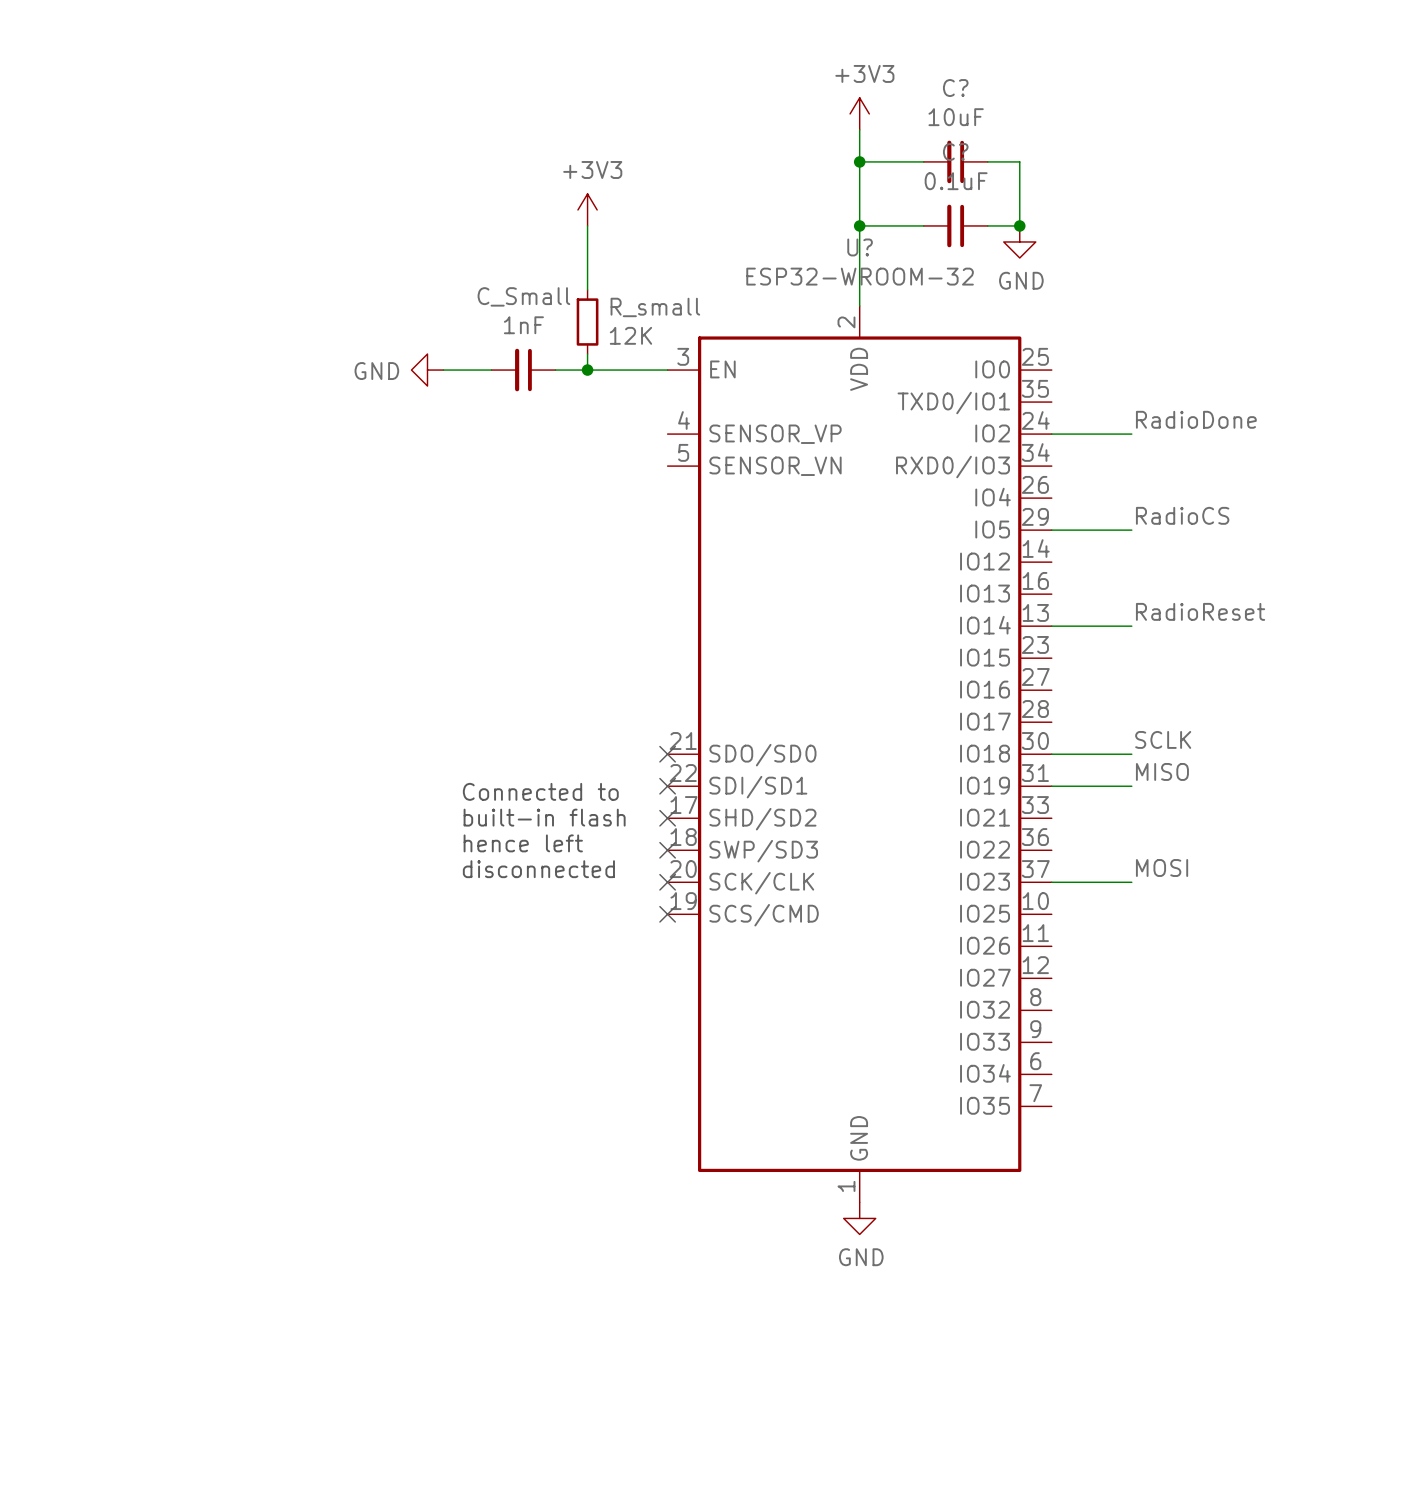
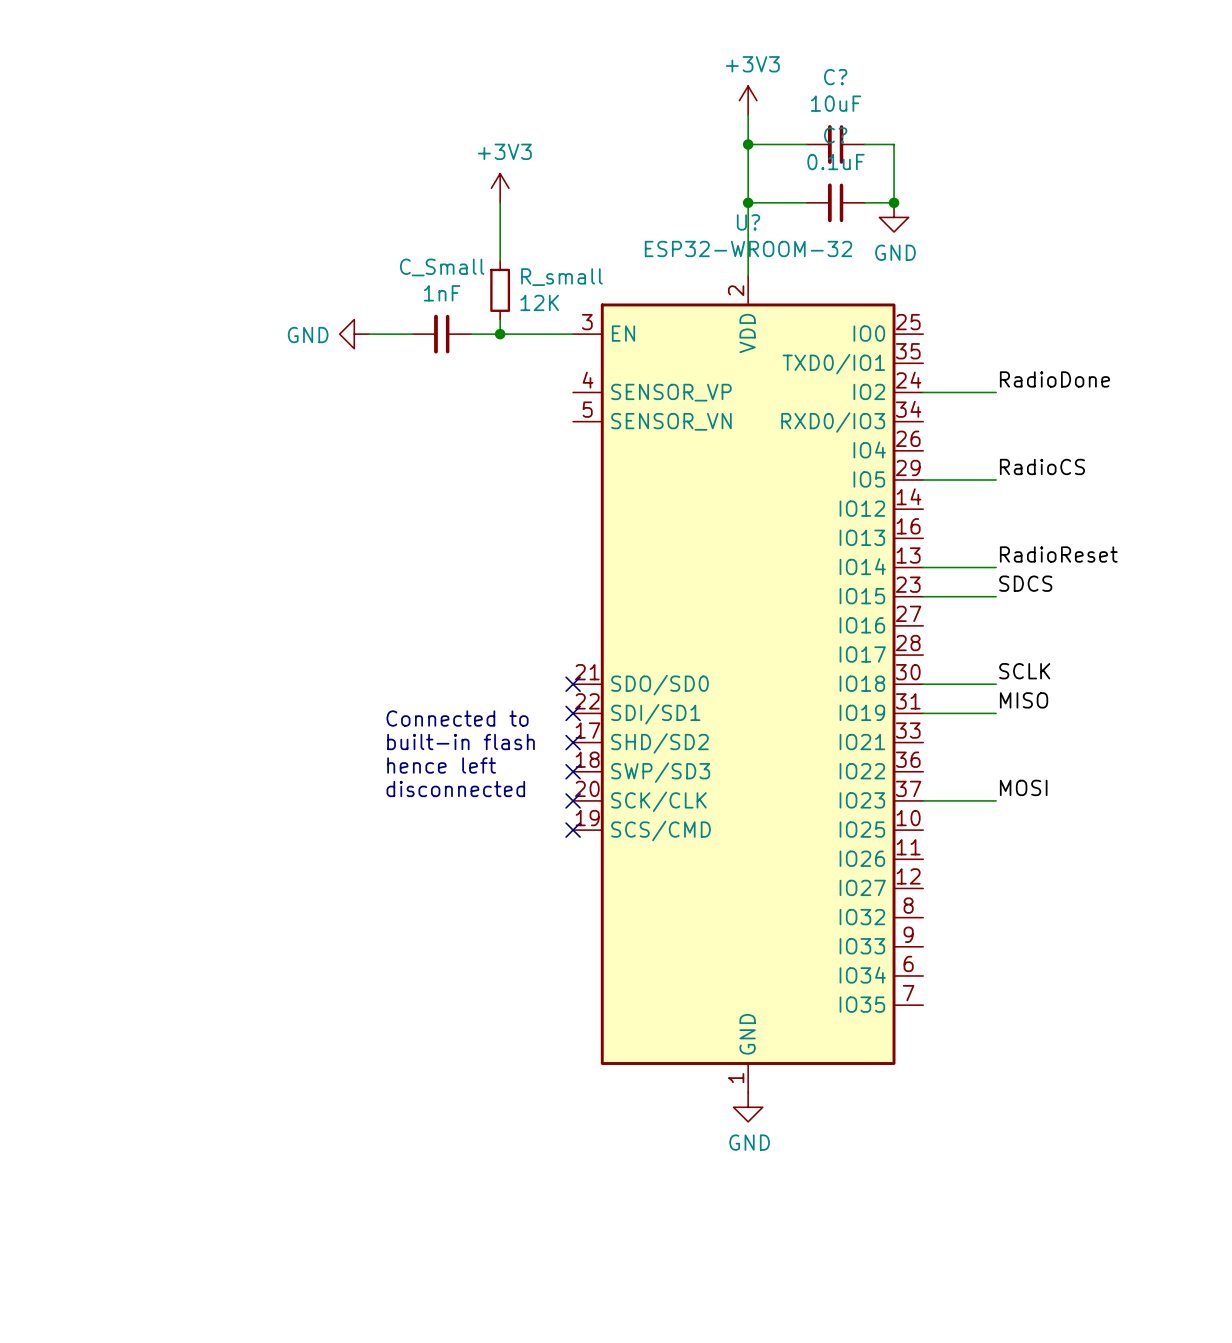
label: none -> SDCS (1025, 583)
wire: none -> (923, 596) (996, 596)

